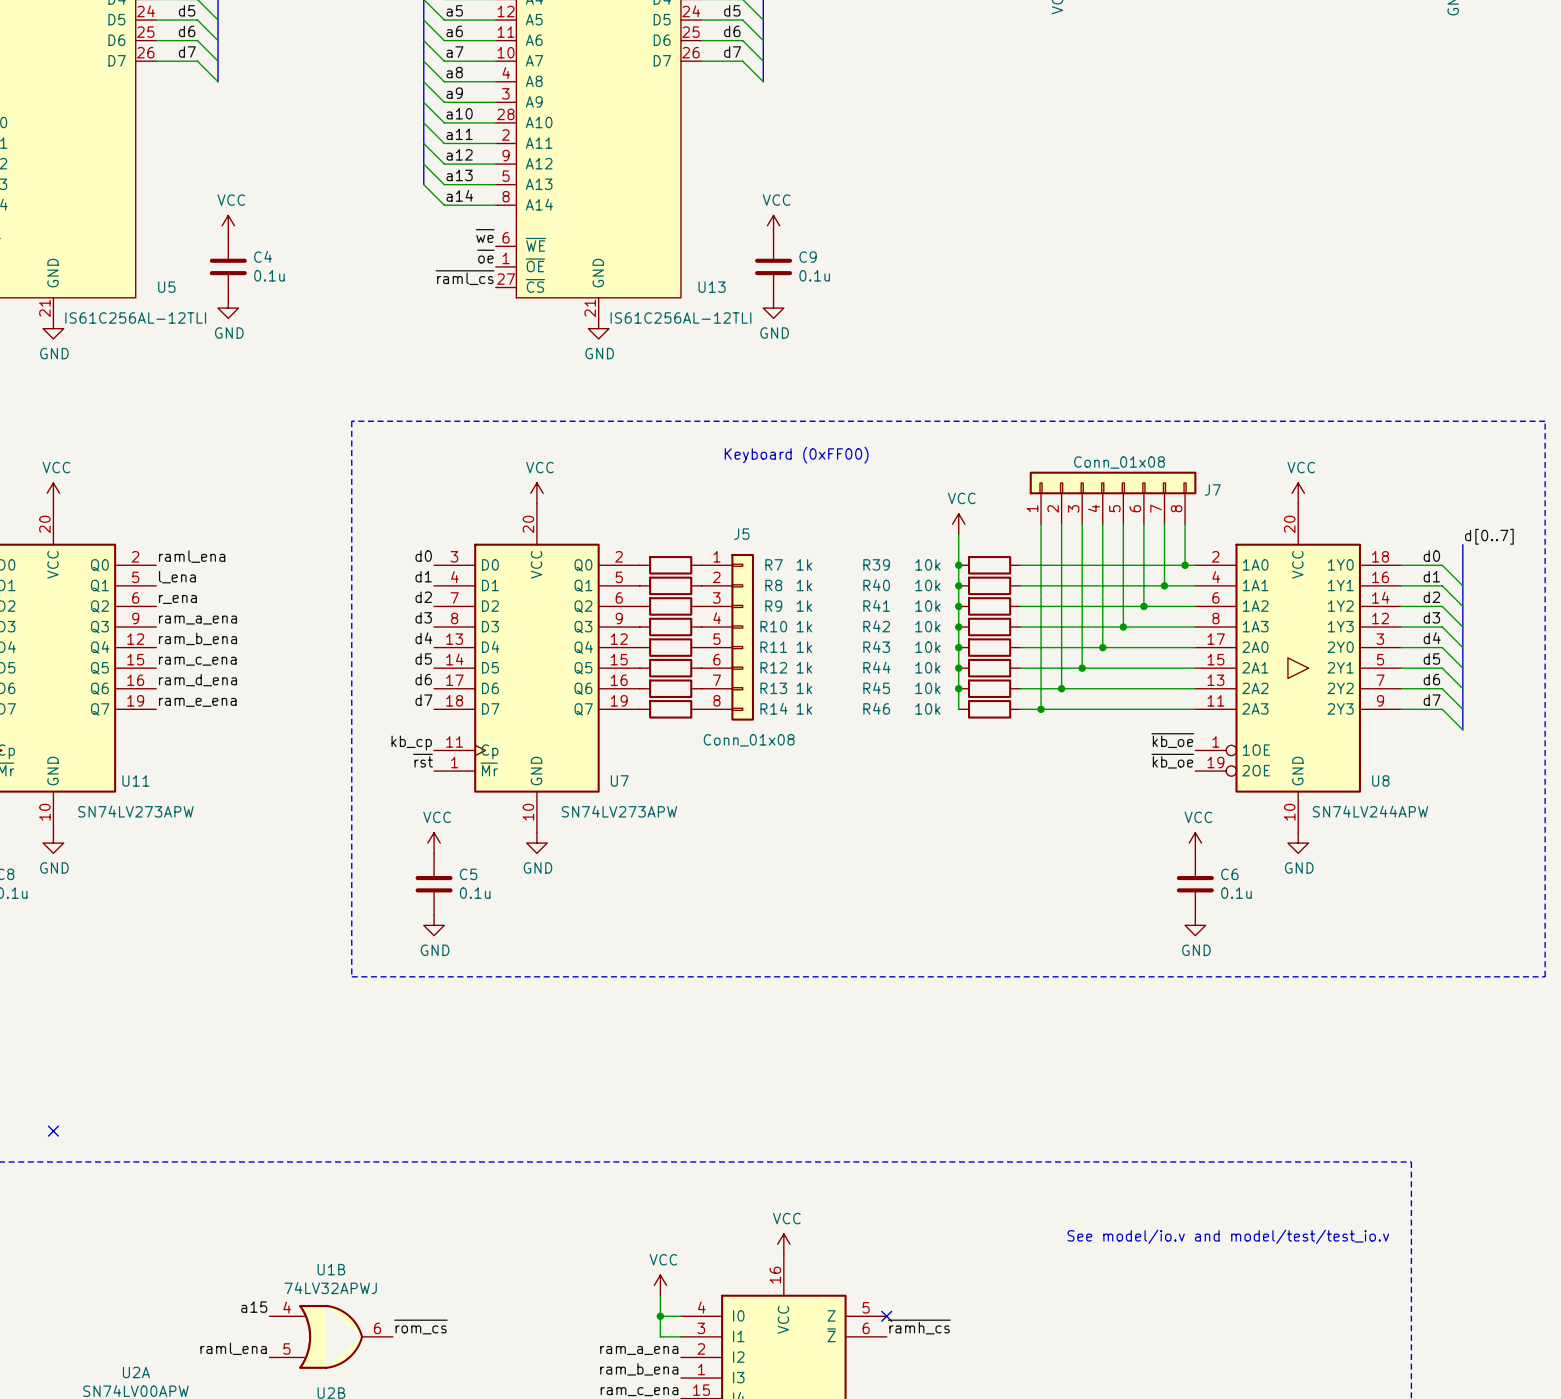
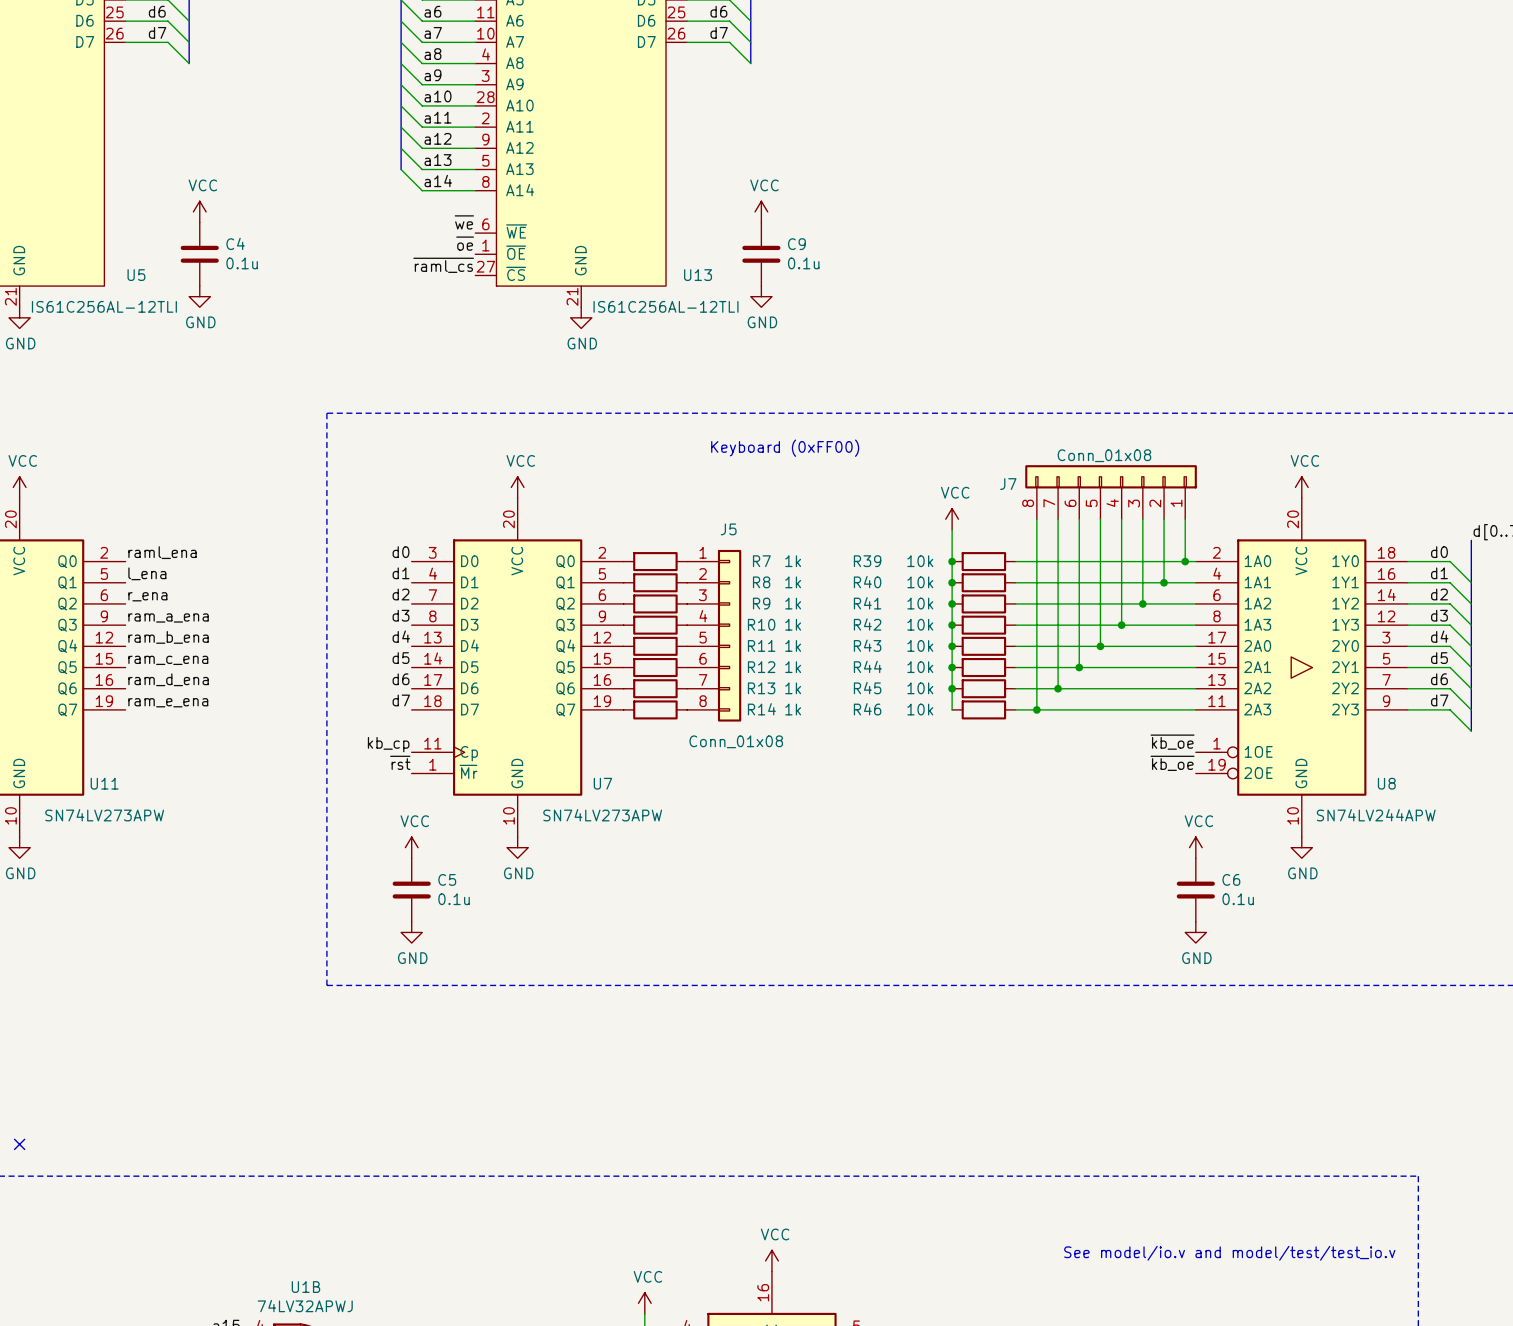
J7 flip: as is (1113, 482) -> left-right (1111, 476)

